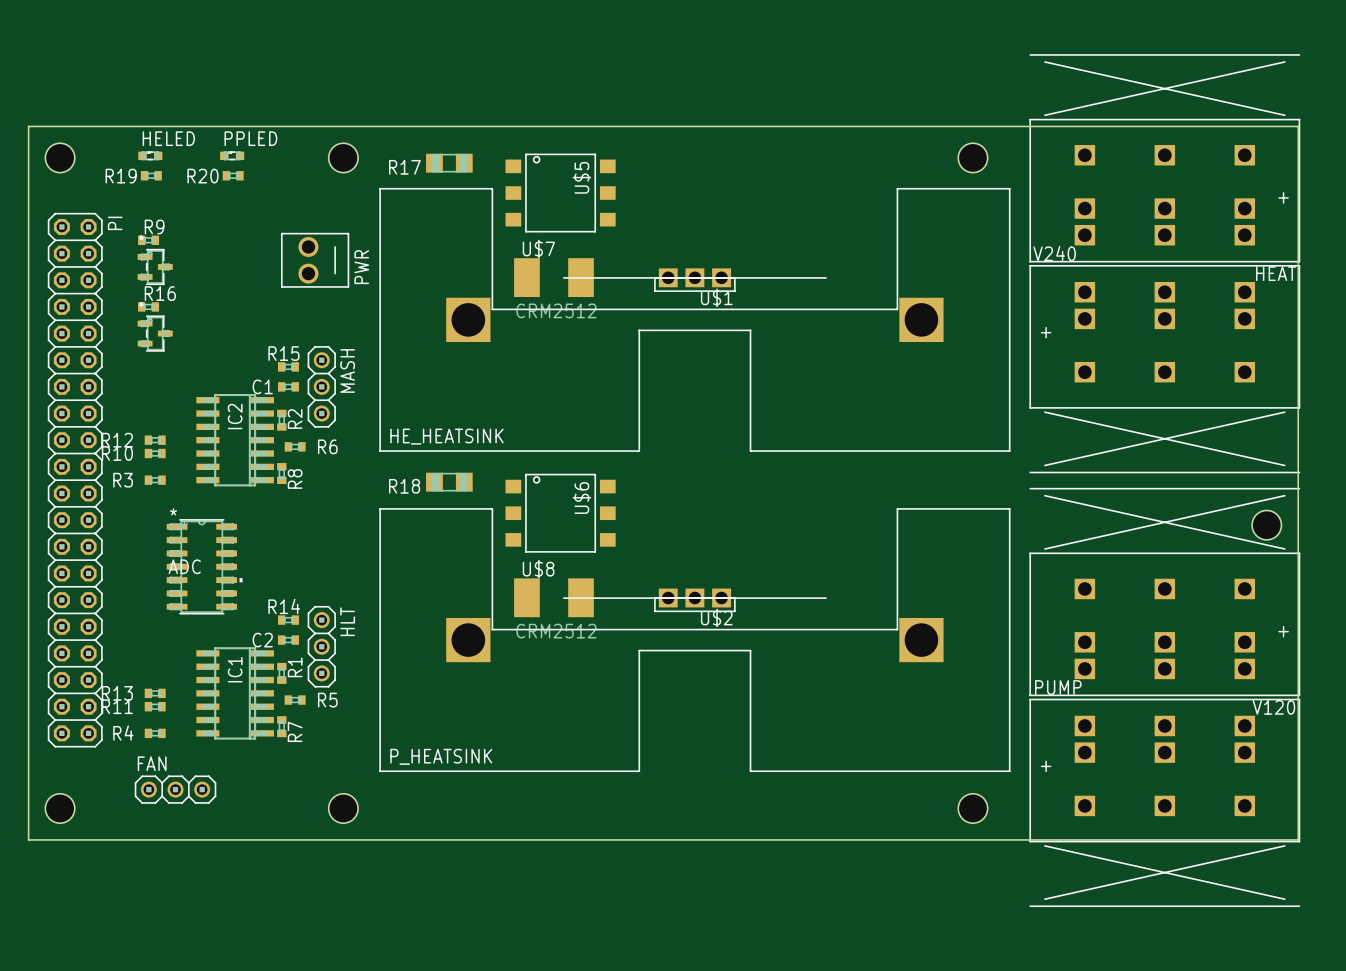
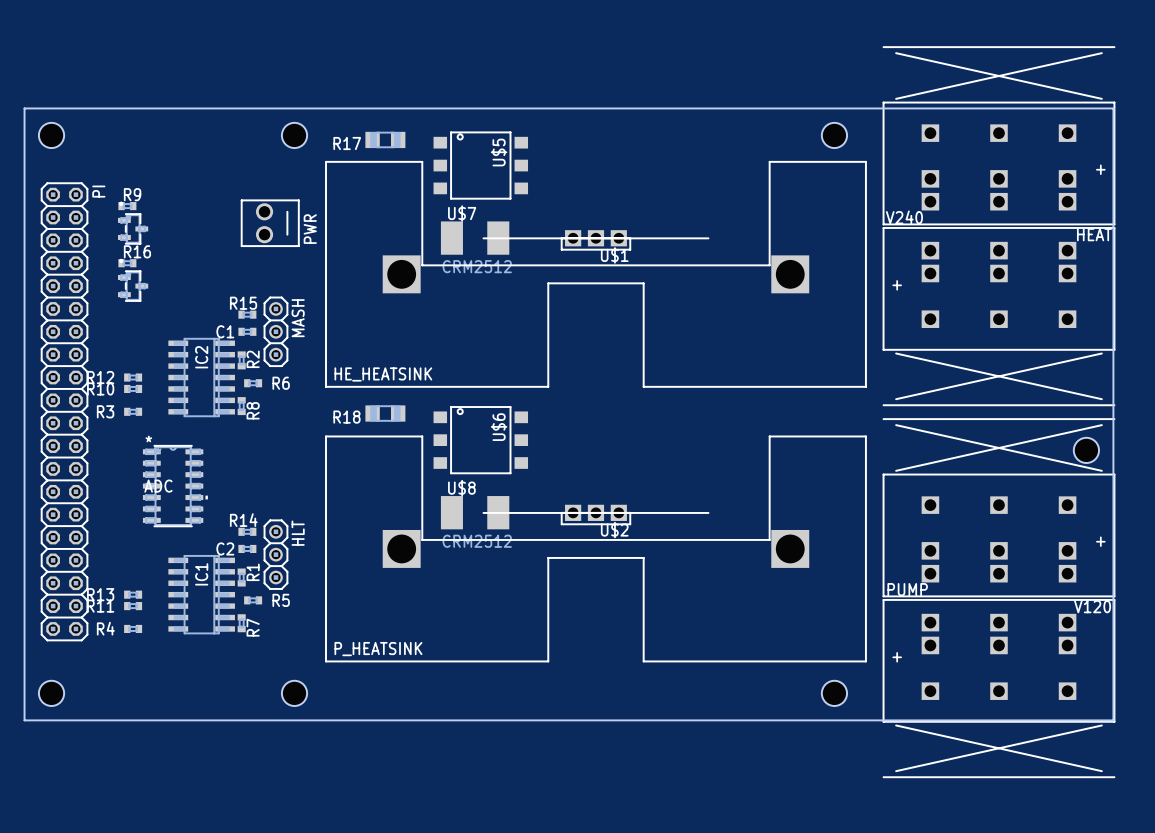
HELED: (150, 155) -> none
PPLED: (232, 155) -> none
R19: (151, 175) -> none
R20: (233, 175) -> none
FAN: (175, 789) -> none

